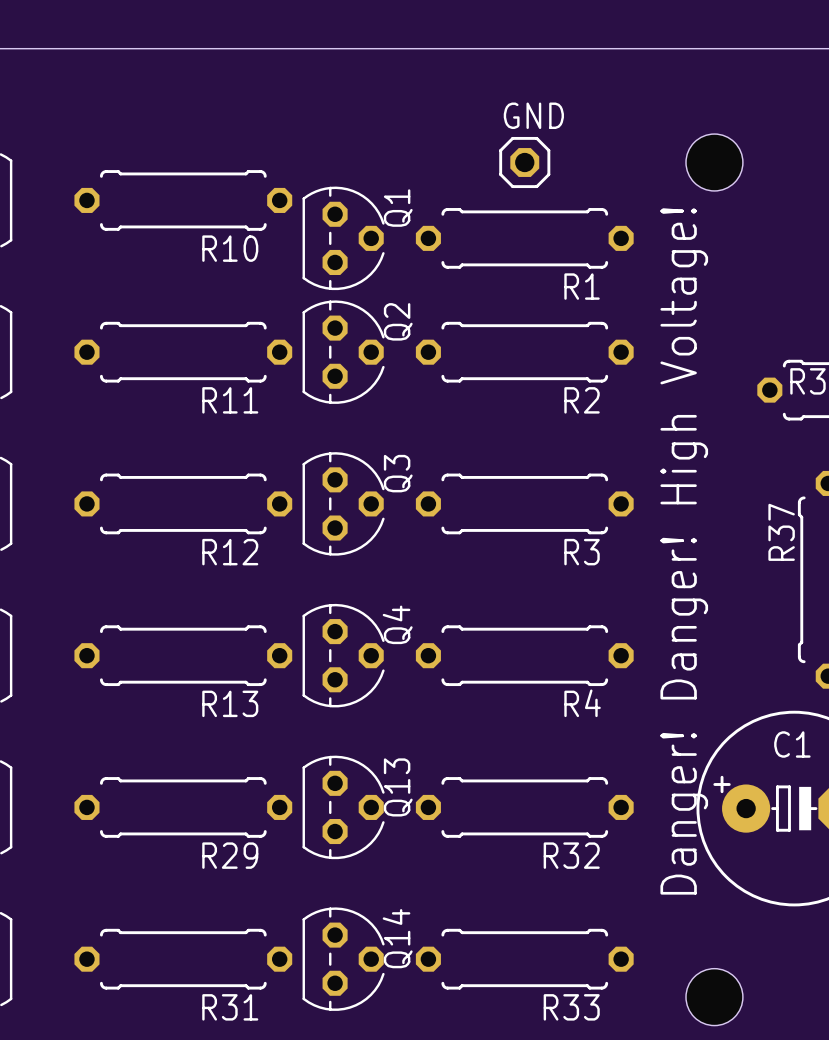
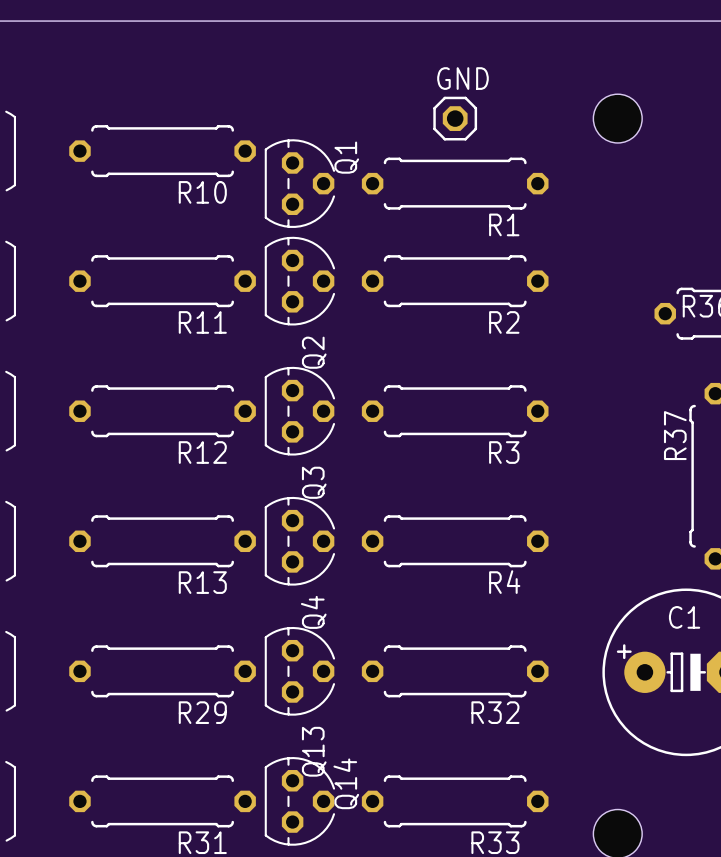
Q2 name position: Q2 (398, 321) -> Q2 (314, 352)
Q3 name position: Q3 (398, 473) -> Q3 (314, 482)
text: Danger! Danger! High Voltage! (684, 551) -> none
Q4 name position: Q4 (397, 624) -> Q4 (313, 612)
Q13 name position: Q13 (398, 787) -> Q13 (314, 751)

